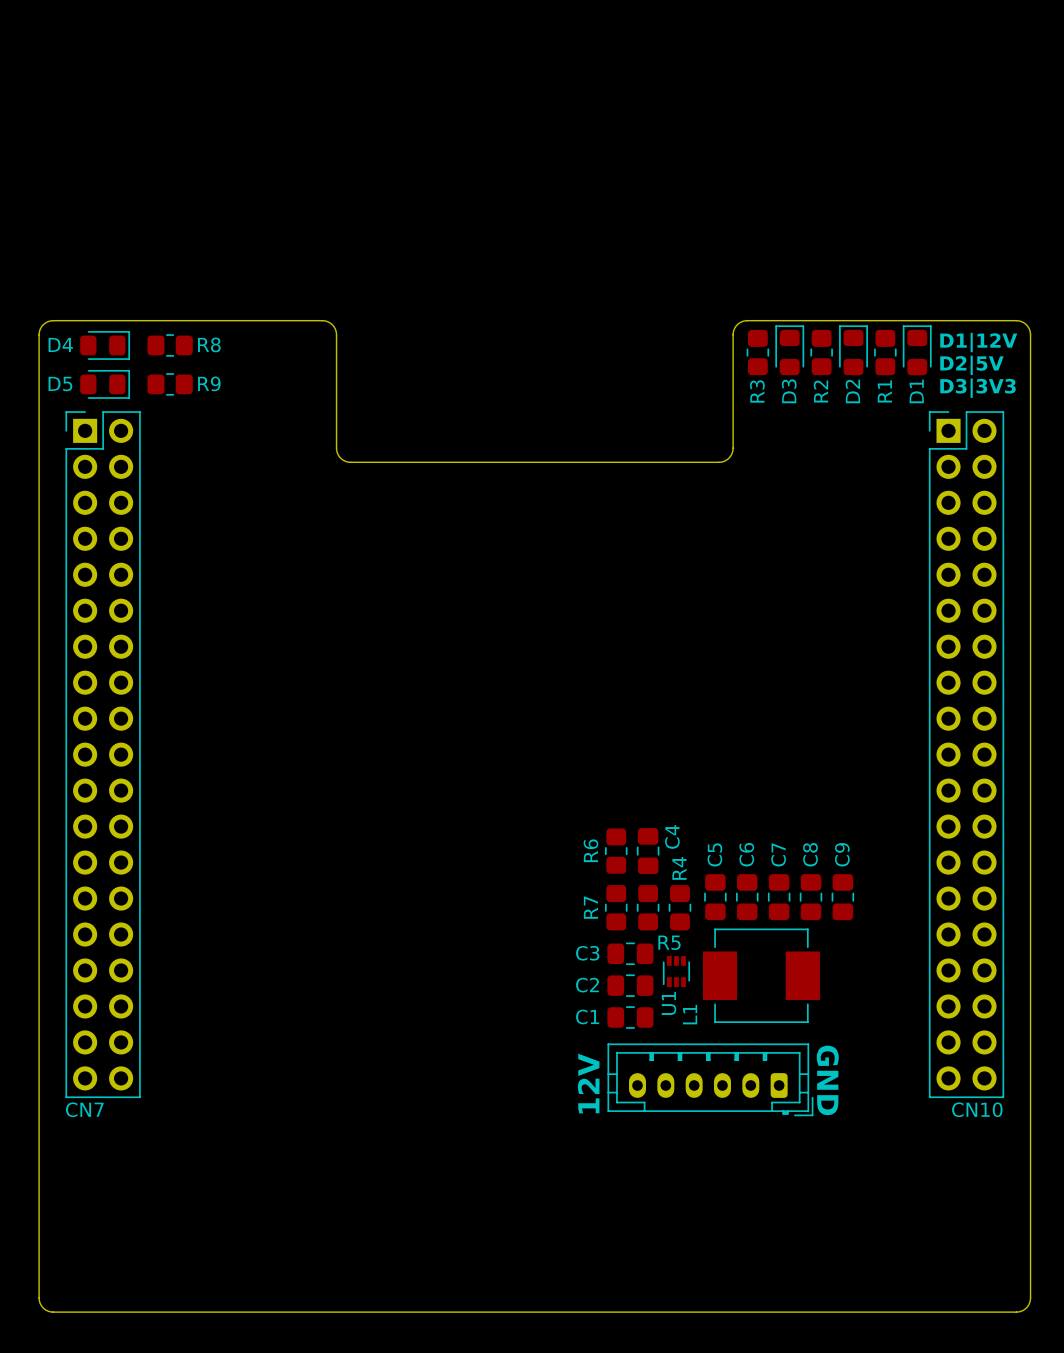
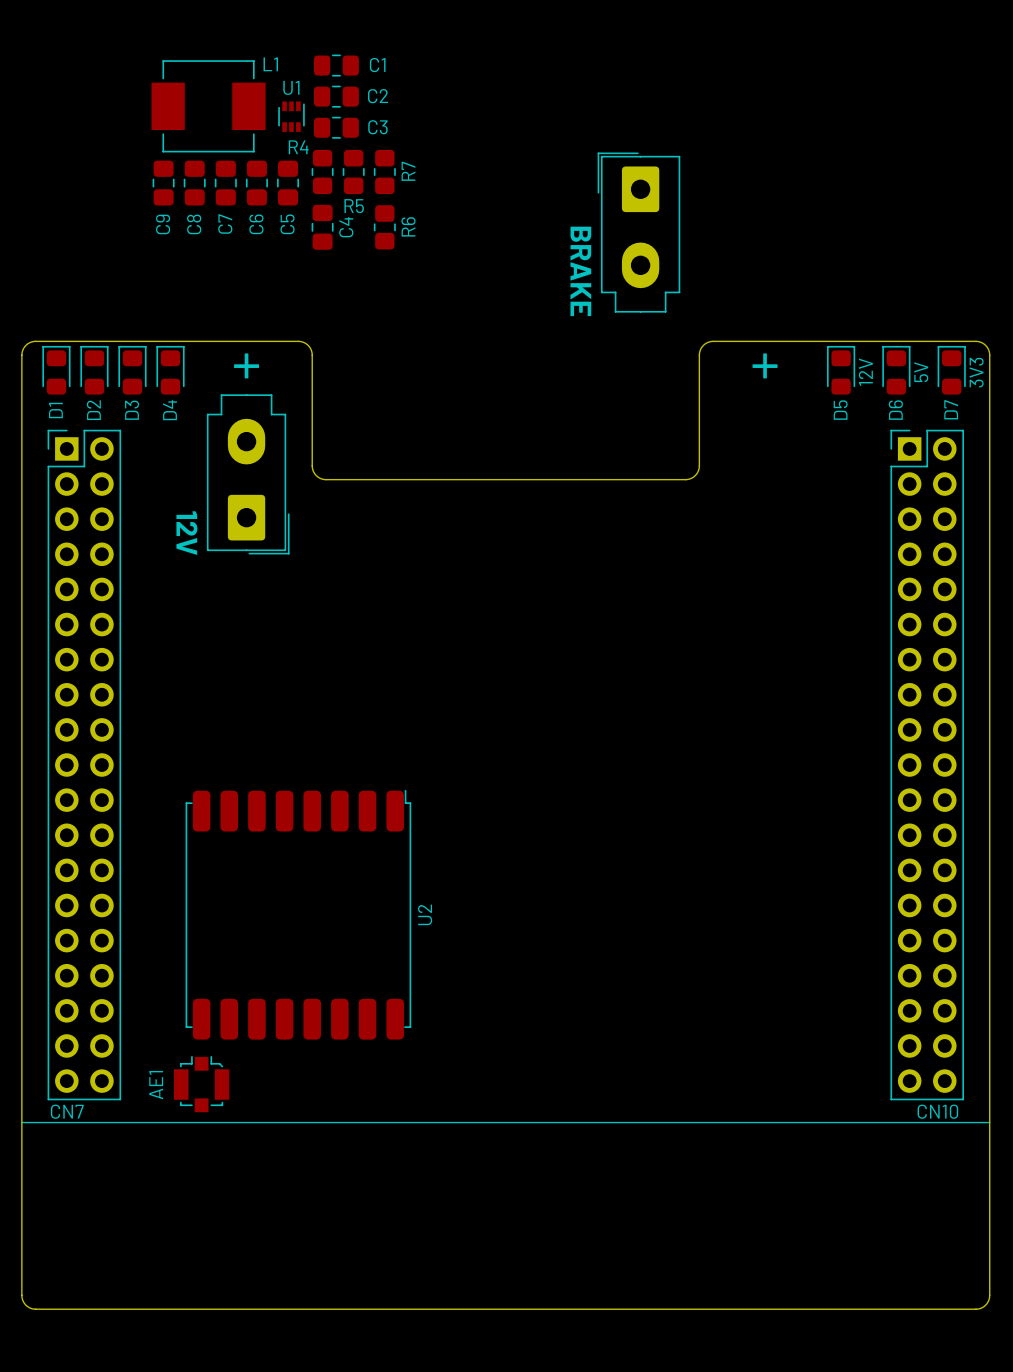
part: none -> (638, 232)
text: none -> BRAKE (580, 271)
text: D1|12V (978, 342) -> none
D4 rotation: 0° (105, 345) -> 90° counterclockwise (170, 370)
D4 position: (105, 345) -> (170, 370)
R8: (170, 345) -> none
text: none -> + (246, 365)
text: none -> + (765, 365)
D3 position: (789, 350) -> (132, 370)
D2 position: (853, 350) -> (94, 370)
D1 position: (917, 350) -> (56, 370)
D6: none -> (896, 370)
D7: none -> (951, 370)
text: none -> 12V (865, 372)
text: none -> 5V (921, 372)
R3: (757, 352) -> none
R2: (821, 352) -> none
R1: (885, 352) -> none
text: D2|5V (971, 365) -> none
D5 rotation: 0° (105, 384) -> 90° counterclockwise (841, 370)
D5 position: (105, 384) -> (841, 370)
R9: (170, 384) -> none
text: D3|3V3 (978, 388) -> 3V3 (976, 372)
part: none -> (248, 474)
text: none -> 12V (186, 533)
C4 name position: C4 (672, 836) -> C4 (346, 227)
R6 name position: R6 (590, 850) -> R6 (408, 226)
R6 position: (616, 851) -> (384, 227)
C4 position: (648, 851) -> (322, 227)
C5 name position: C5 (714, 854) -> C5 (287, 224)
C6 name position: C6 (746, 854) -> C6 (256, 224)
C7 name position: C7 (778, 854) -> C7 (225, 224)
C8 name position: C8 (810, 854) -> C8 (194, 224)
C9 name position: C9 (842, 854) -> C9 (163, 224)
R4 name rotation: 0° (679, 868) -> 90° clockwise (298, 147)
C5 position: (715, 897) -> (288, 183)
C6 position: (747, 897) -> (256, 183)
C7 position: (779, 897) -> (225, 183)
C8 position: (811, 897) -> (194, 183)
C9 position: (842, 897) -> (163, 183)
R7 name position: R7 (590, 907) -> R7 (408, 171)
R7 position: (616, 907) -> (384, 172)
R5 position: (648, 907) -> (353, 172)
R4 position: (679, 907) -> (322, 172)
U2: none -> (298, 914)
R5 name position: R5 (669, 942) -> R5 (354, 206)
C3 name position: C3 (587, 953) -> C3 (377, 127)
C3 position: (630, 953) -> (336, 127)
U1 rotation: 0° (676, 971) -> 180° (291, 116)
U1 position: (676, 971) -> (291, 116)
L1 position: (761, 975) -> (208, 106)
C2 name position: C2 (587, 985) -> C2 (378, 96)
C2 position: (630, 985) -> (336, 96)
L1 name rotation: 0° (690, 1014) -> 90° clockwise (270, 64)
L1 name position: L1 (690, 1014) -> L1 (270, 64)
C1 name position: C1 (587, 1017) -> C1 (377, 65)
C1 position: (630, 1017) -> (336, 65)
part: (710, 1079) -> none
text: GND (827, 1080) -> none
AE1: none -> (201, 1084)
text: 12V (588, 1083) -> none
line: none -> (21, 1122) (989, 1122)

